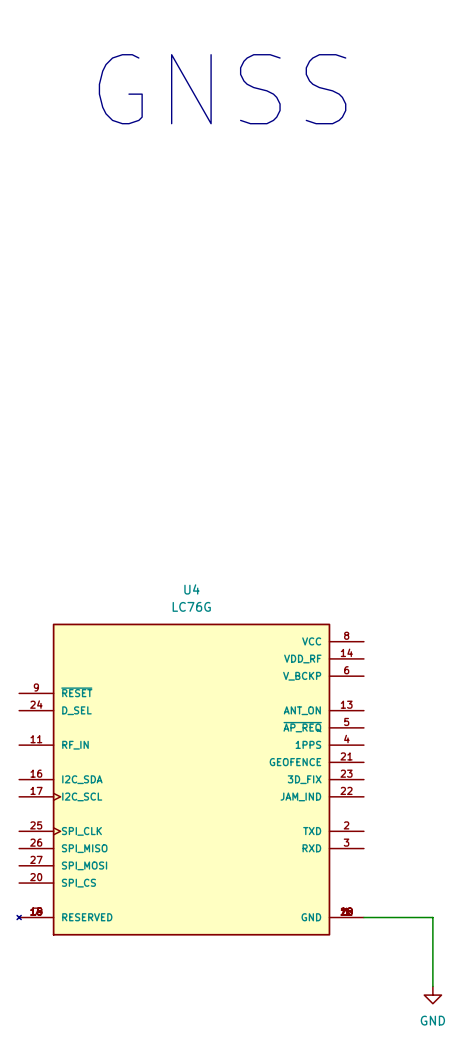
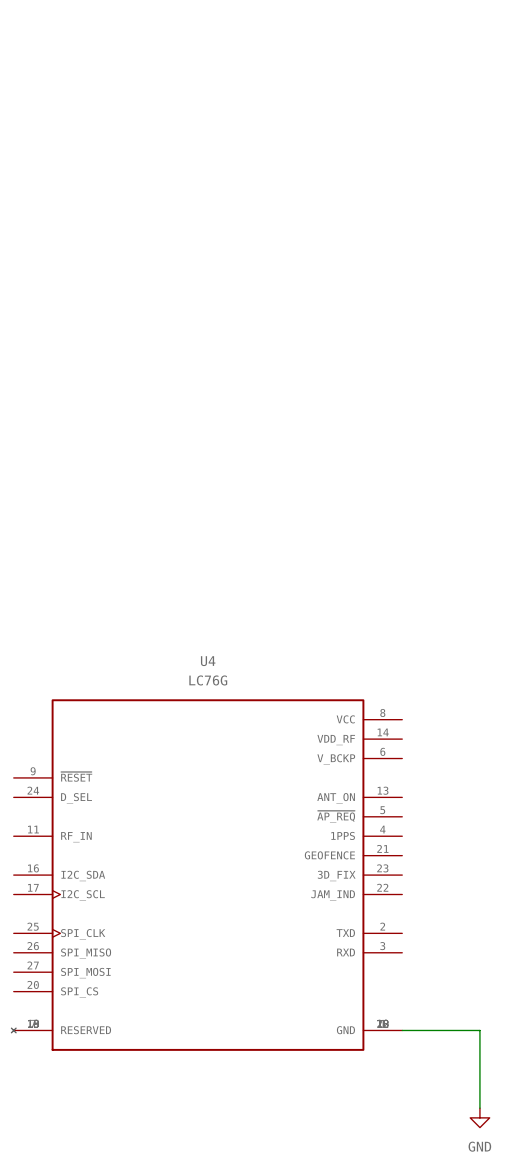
text: GNSS (222, 89) -> none

